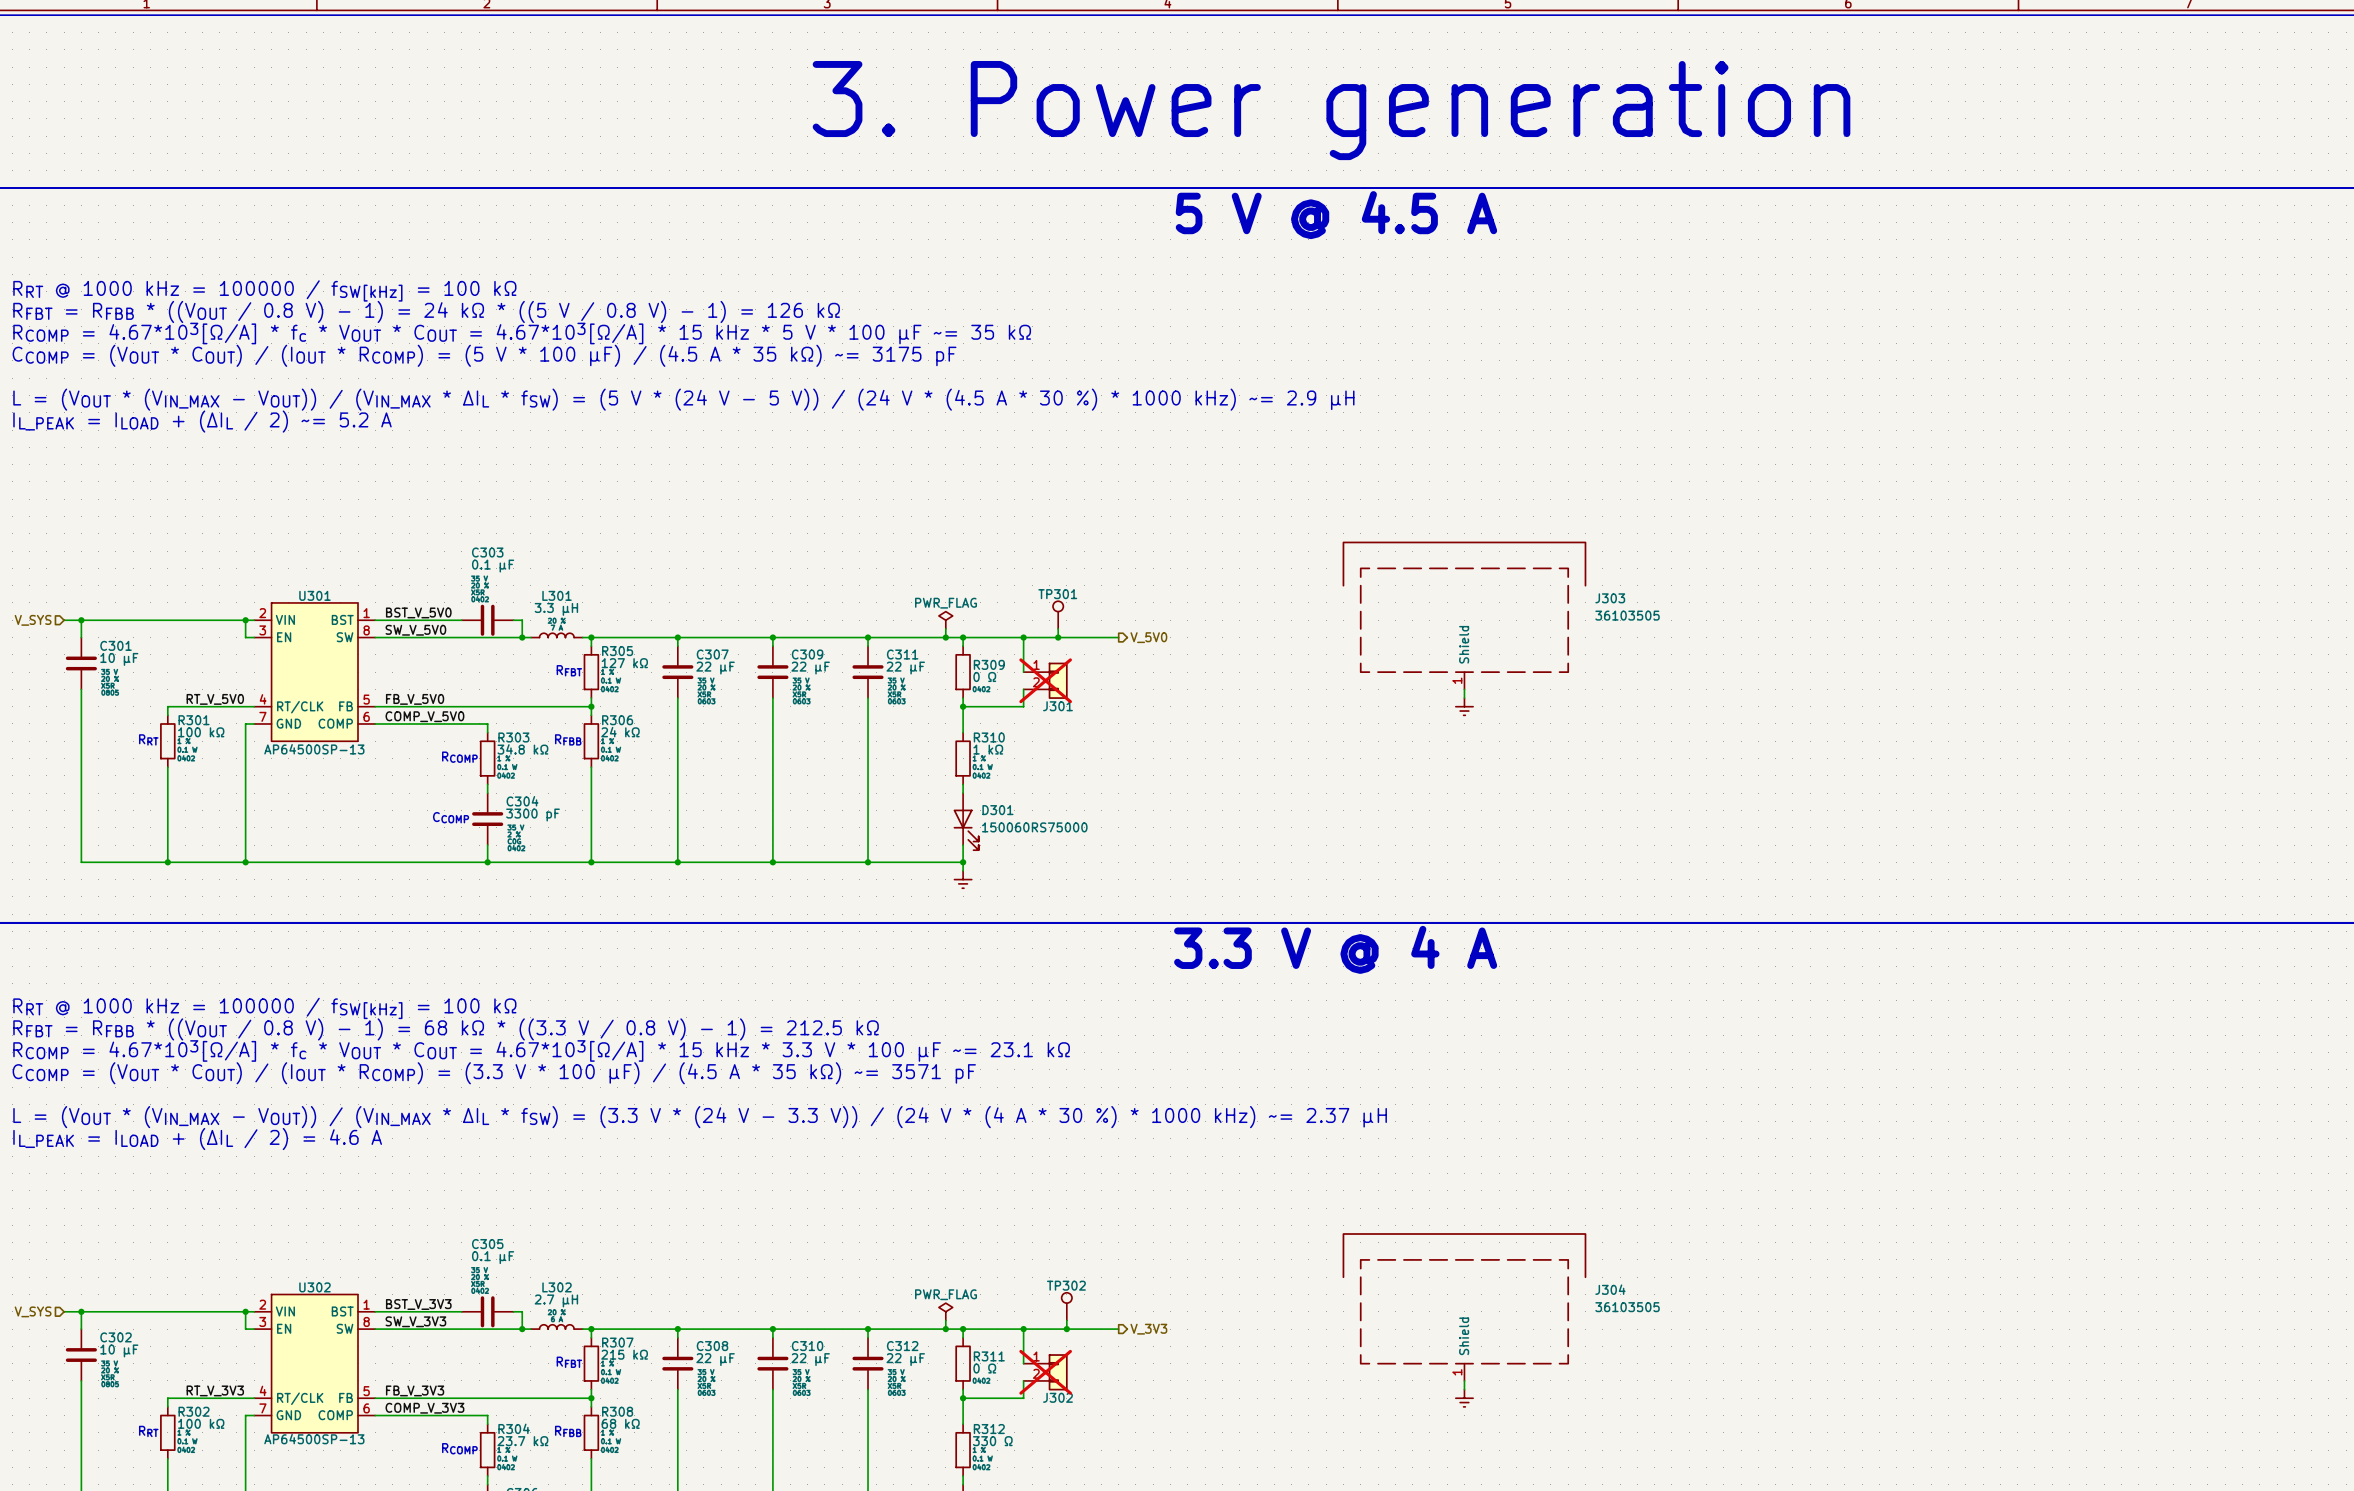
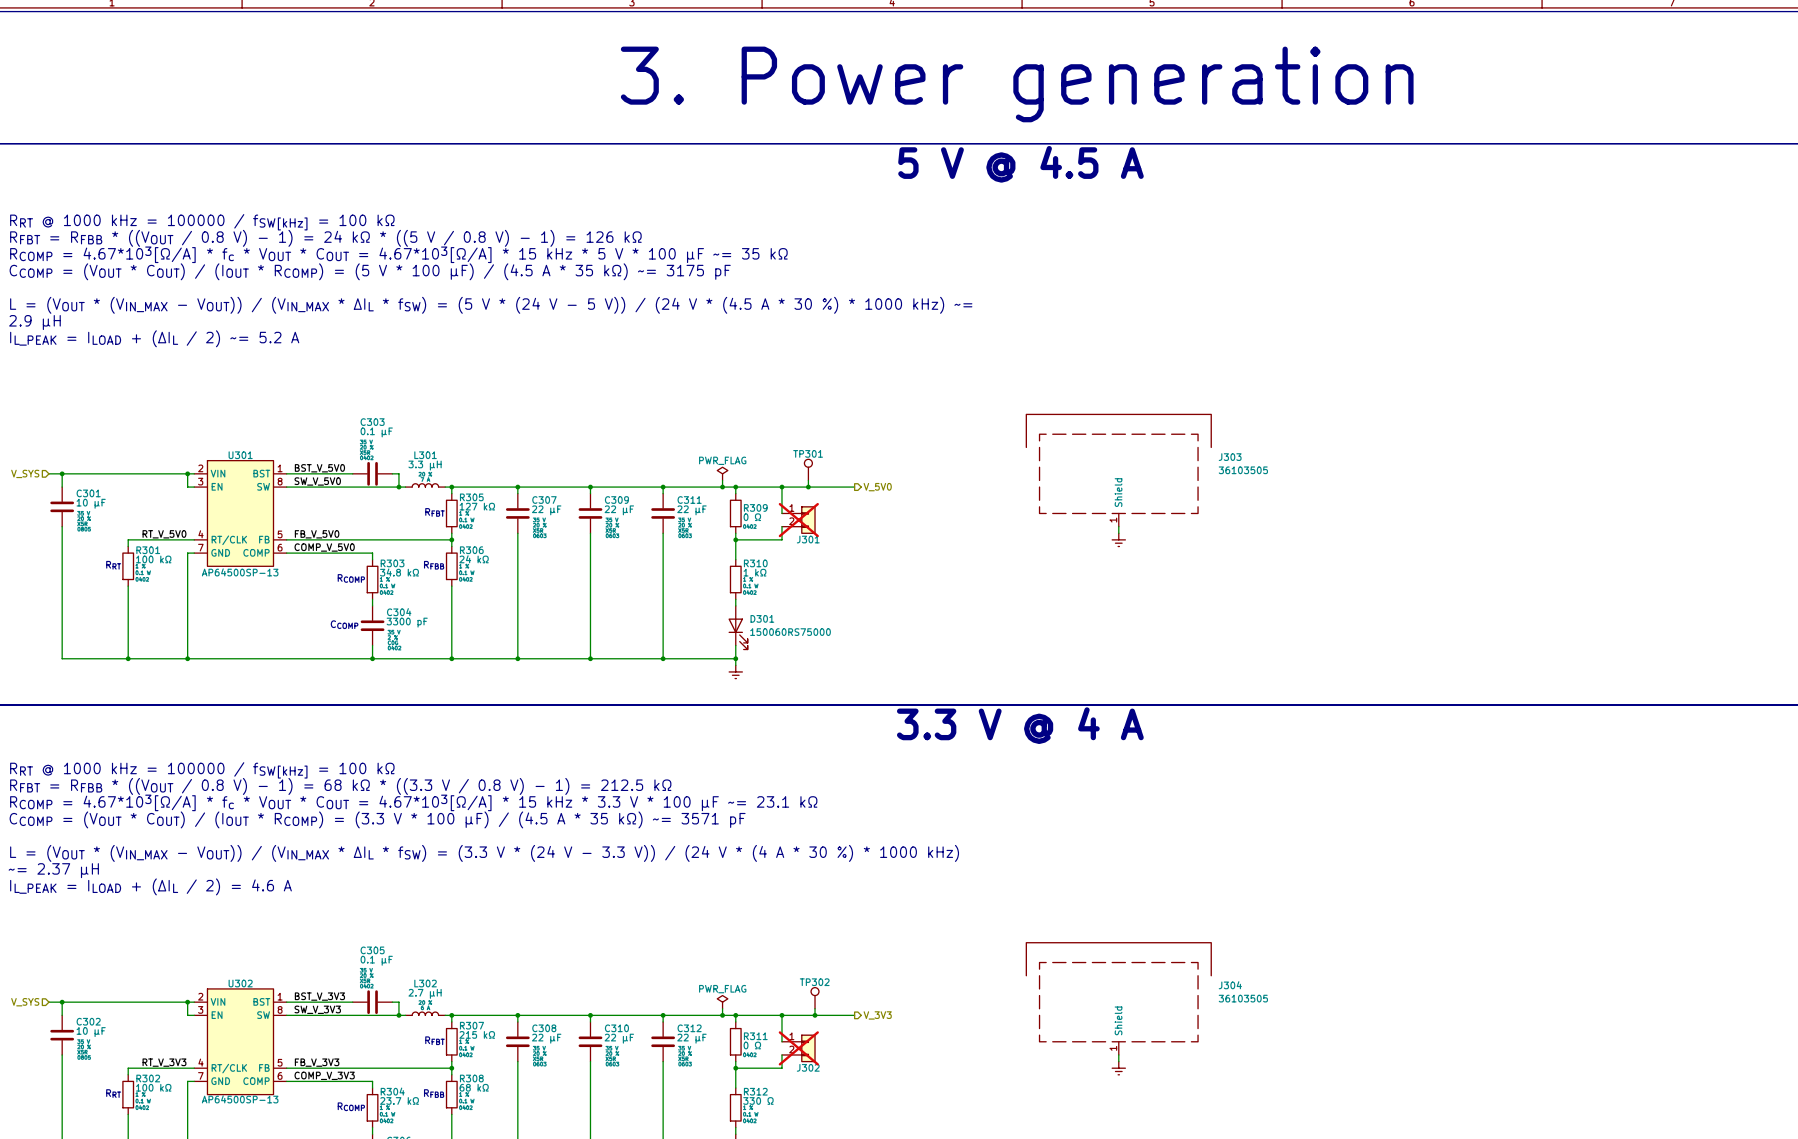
text: L = (VOUT * (VIN_MAX - VOUT)) / (VIN_MAX * ∆IL * fSW) = (5 V * (24 V - 5 V)) / (24 V * (4.5 A * 30 %) * 1000 kHz) ~= 2.9 µH (683, 399) -> L = (VOUT * (VIN_MAX - VOUT)) / (VIN_MAX * ∆IL * fSW) = (5 V * (24 V - 5 V)) / (24 V * (4.5 A * 30 %) * 1000 kHz) ~= (491, 305)
text: IL_PEAK = ILOAD + (∆IL / 2) ~= 5.2 A (202, 421) -> 2.9 µH (34, 322)
text: none -> IL_PEAK = ILOAD + (∆IL / 2) ~= 5.2 A (154, 338)
text: L = (VOUT * (VIN_MAX - VOUT)) / (VIN_MAX * ∆IL * fSW) = (3.3 V * (24 V - 3.3 V)) / (24 V * (4 A * 30 %) * 1000 kHz) ~= 2.37 µH (700, 1117) -> L = (VOUT * (VIN_MAX - VOUT)) / (VIN_MAX * ∆IL * fSW) = (3.3 V * (24 V - 3.3 V)) / (24 V * (4 A * 30 %) * 1000 kHz) (484, 853)
text: IL_PEAK = ILOAD + (∆IL / 2) = 4.6 A (197, 1139) -> ~= 2.37 µH (53, 870)
text: none -> IL_PEAK = ILOAD + (∆IL / 2) = 4.6 A (150, 886)

